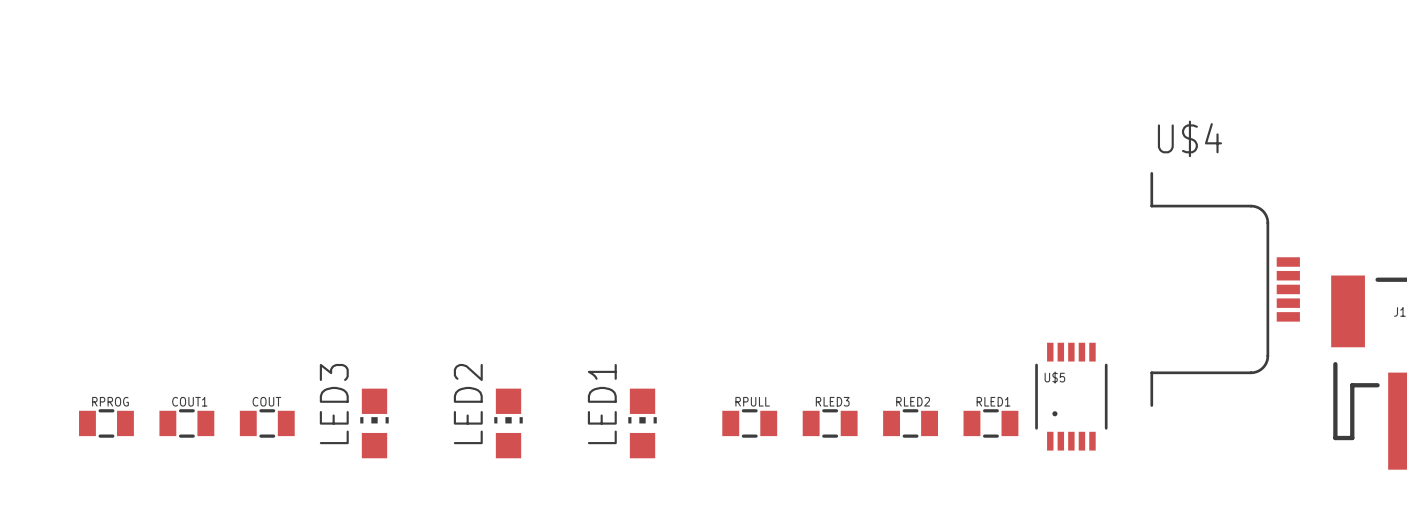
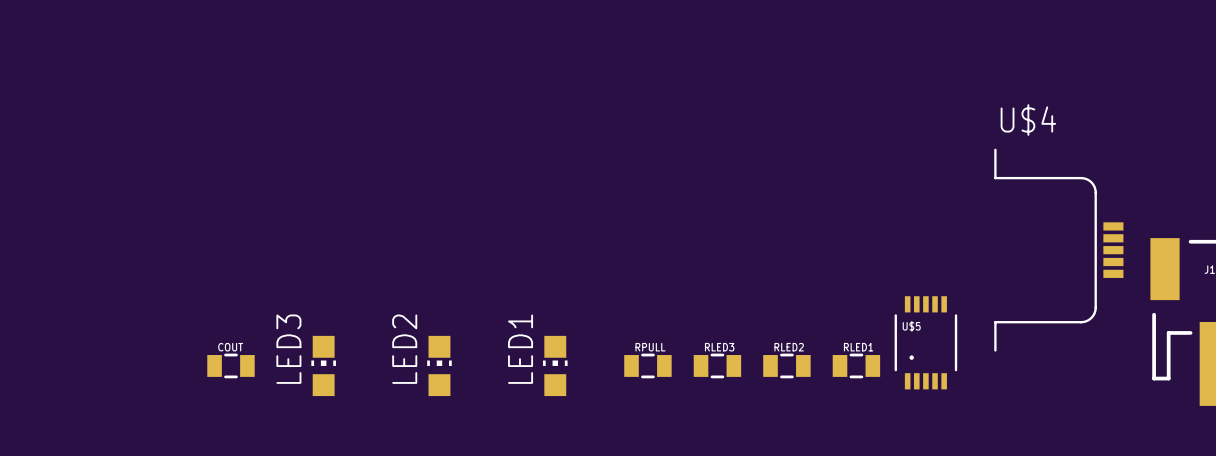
RPROG: (106, 423) -> none
COUT1: (186, 423) -> none

